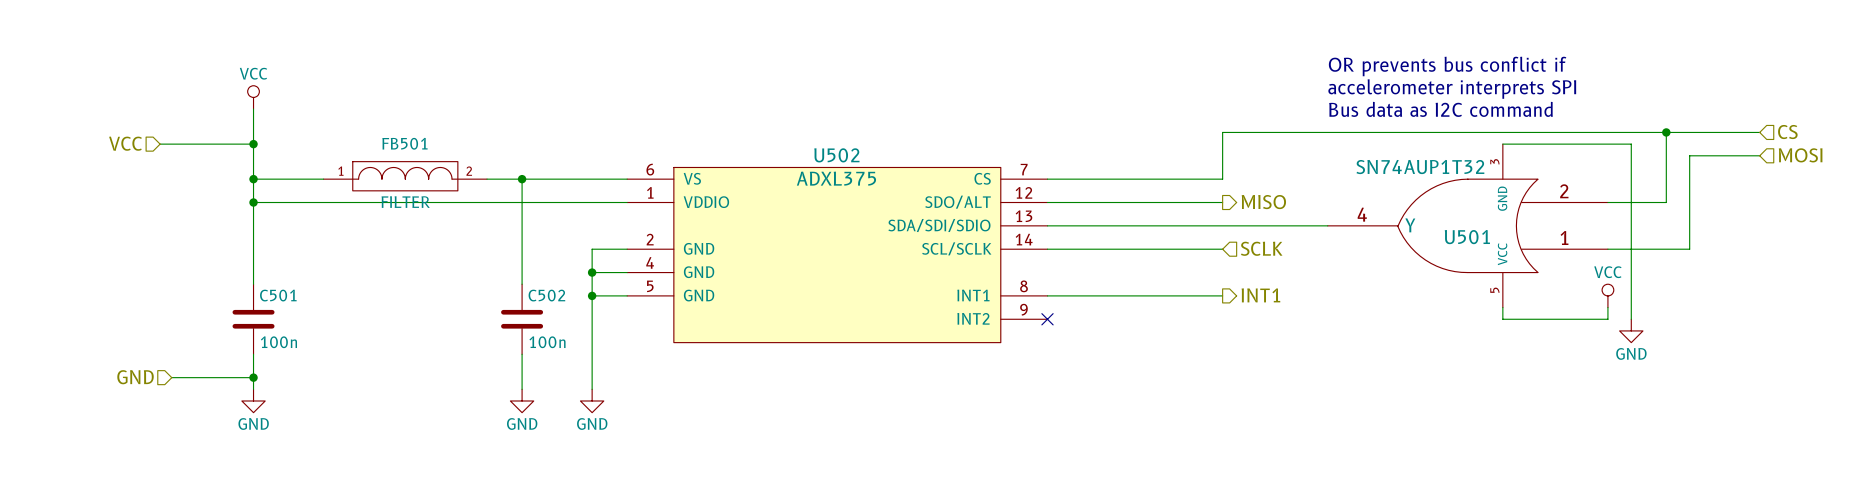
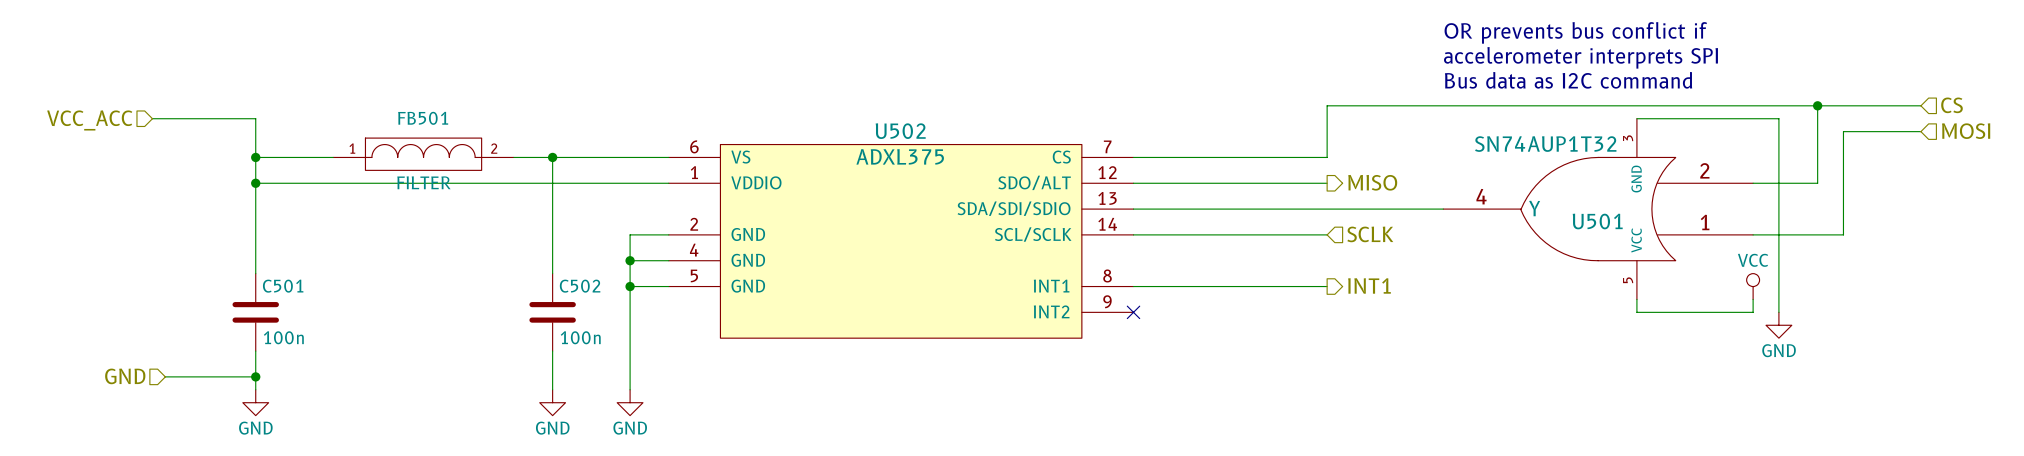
power symbol: VCC (253, 97) -> none
wire: (253, 109) (253, 144) -> none
hierarchical label: VCC (125, 143) -> VCC_ACC (89, 120)
junction: (253, 144) -> none

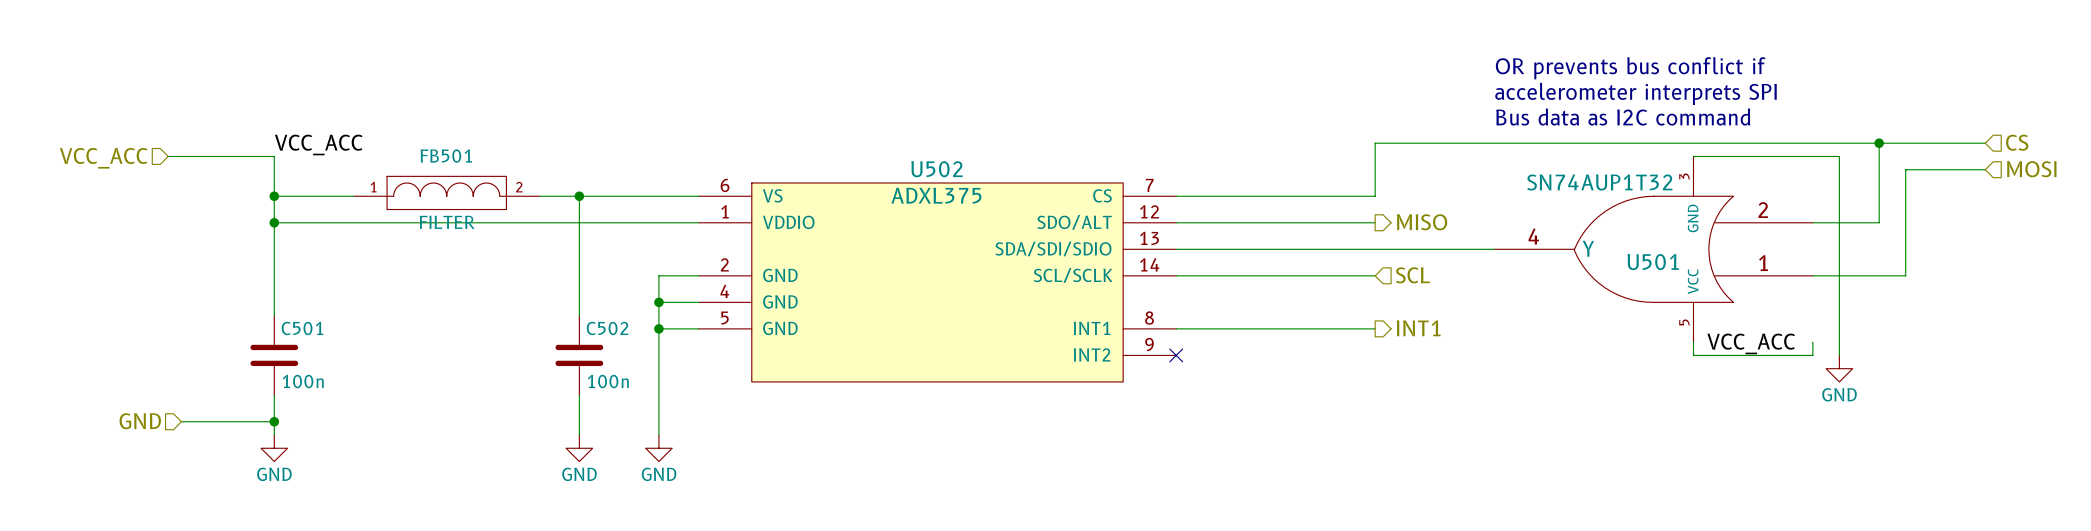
label: none -> VCC_ACC (318, 144)
hierarchical label: SCLK (1370, 234) -> SCL (1412, 275)
power symbol: VCC (1753, 286) -> none
label: none -> VCC_ACC (1751, 343)

